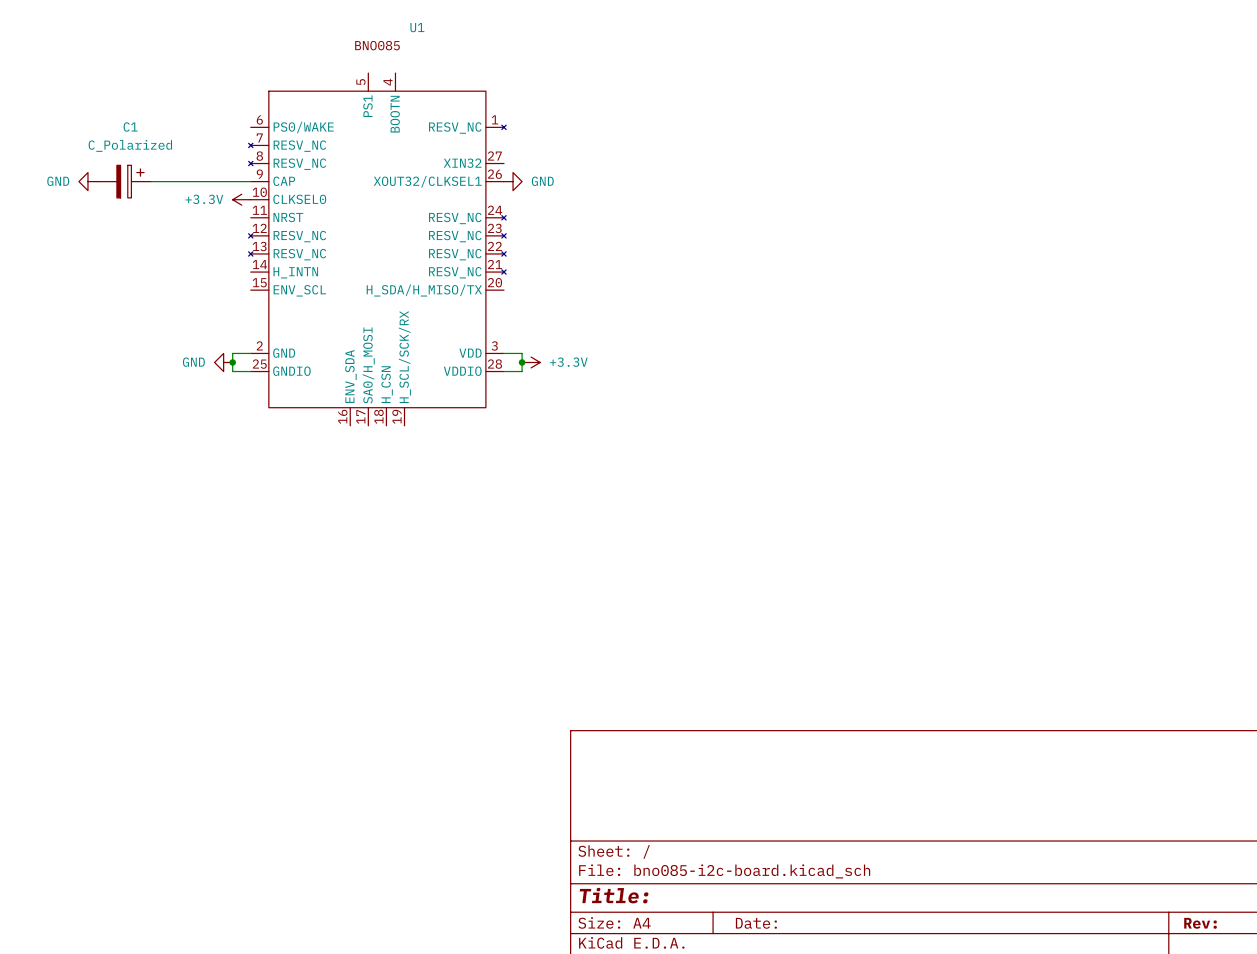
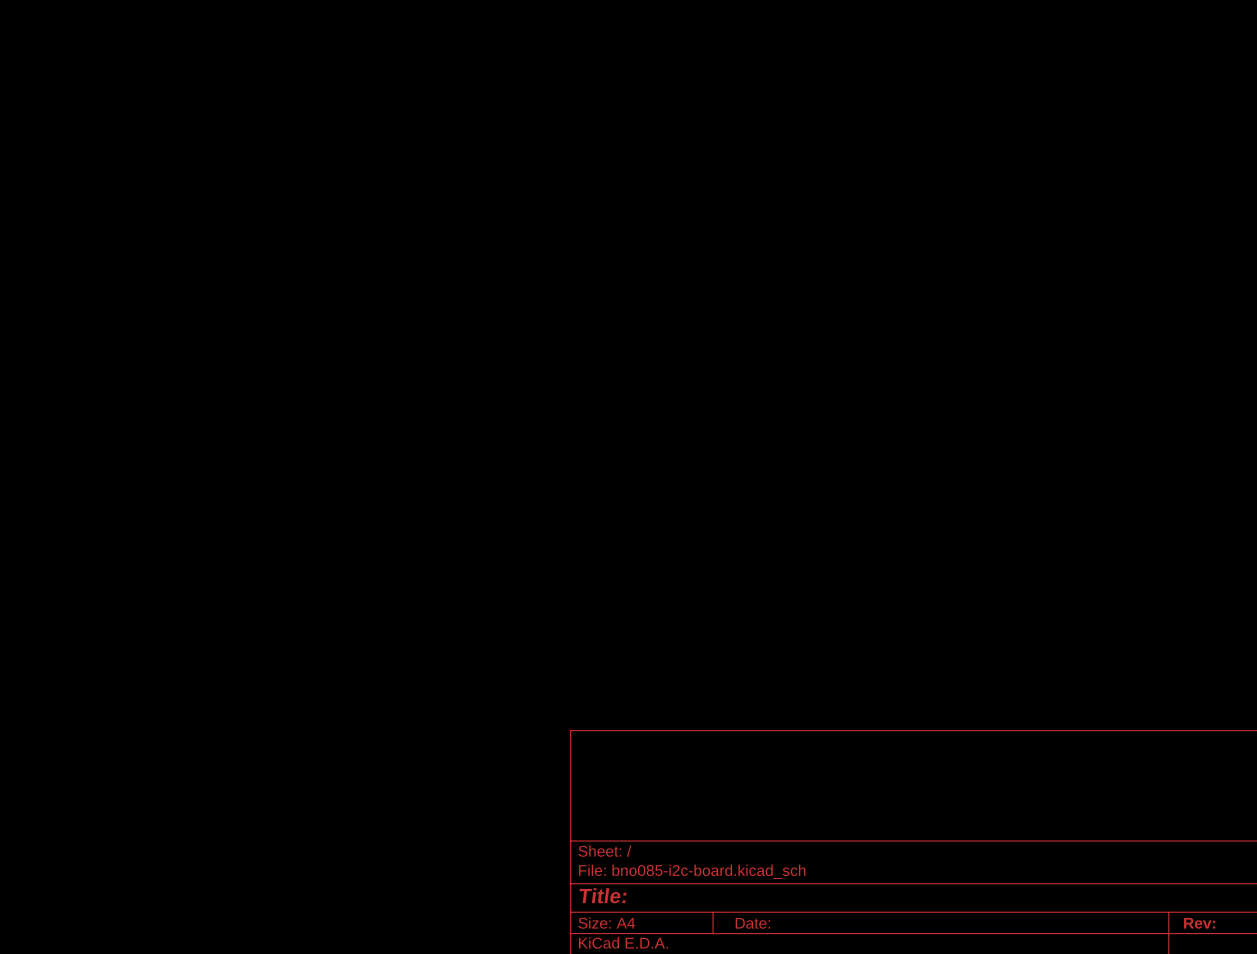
power symbol: GND (87, 181) -> none
C1: C_Polarized (124, 181) -> none
wire: (151, 181) (250, 181) -> none
power symbol: GND (513, 181) -> none
power symbol: +3.3V (241, 199) -> none
U1: (377, 249) -> none
wire: (250, 353) (232, 353) (232, 371) (250, 371) -> none
wire: (503, 353) (522, 353) (522, 371) (503, 371) -> none
power symbol: GND (223, 362) -> none
junction: (232, 362) -> none
junction: (522, 362) -> none
power symbol: +3.3V (531, 362) -> none

